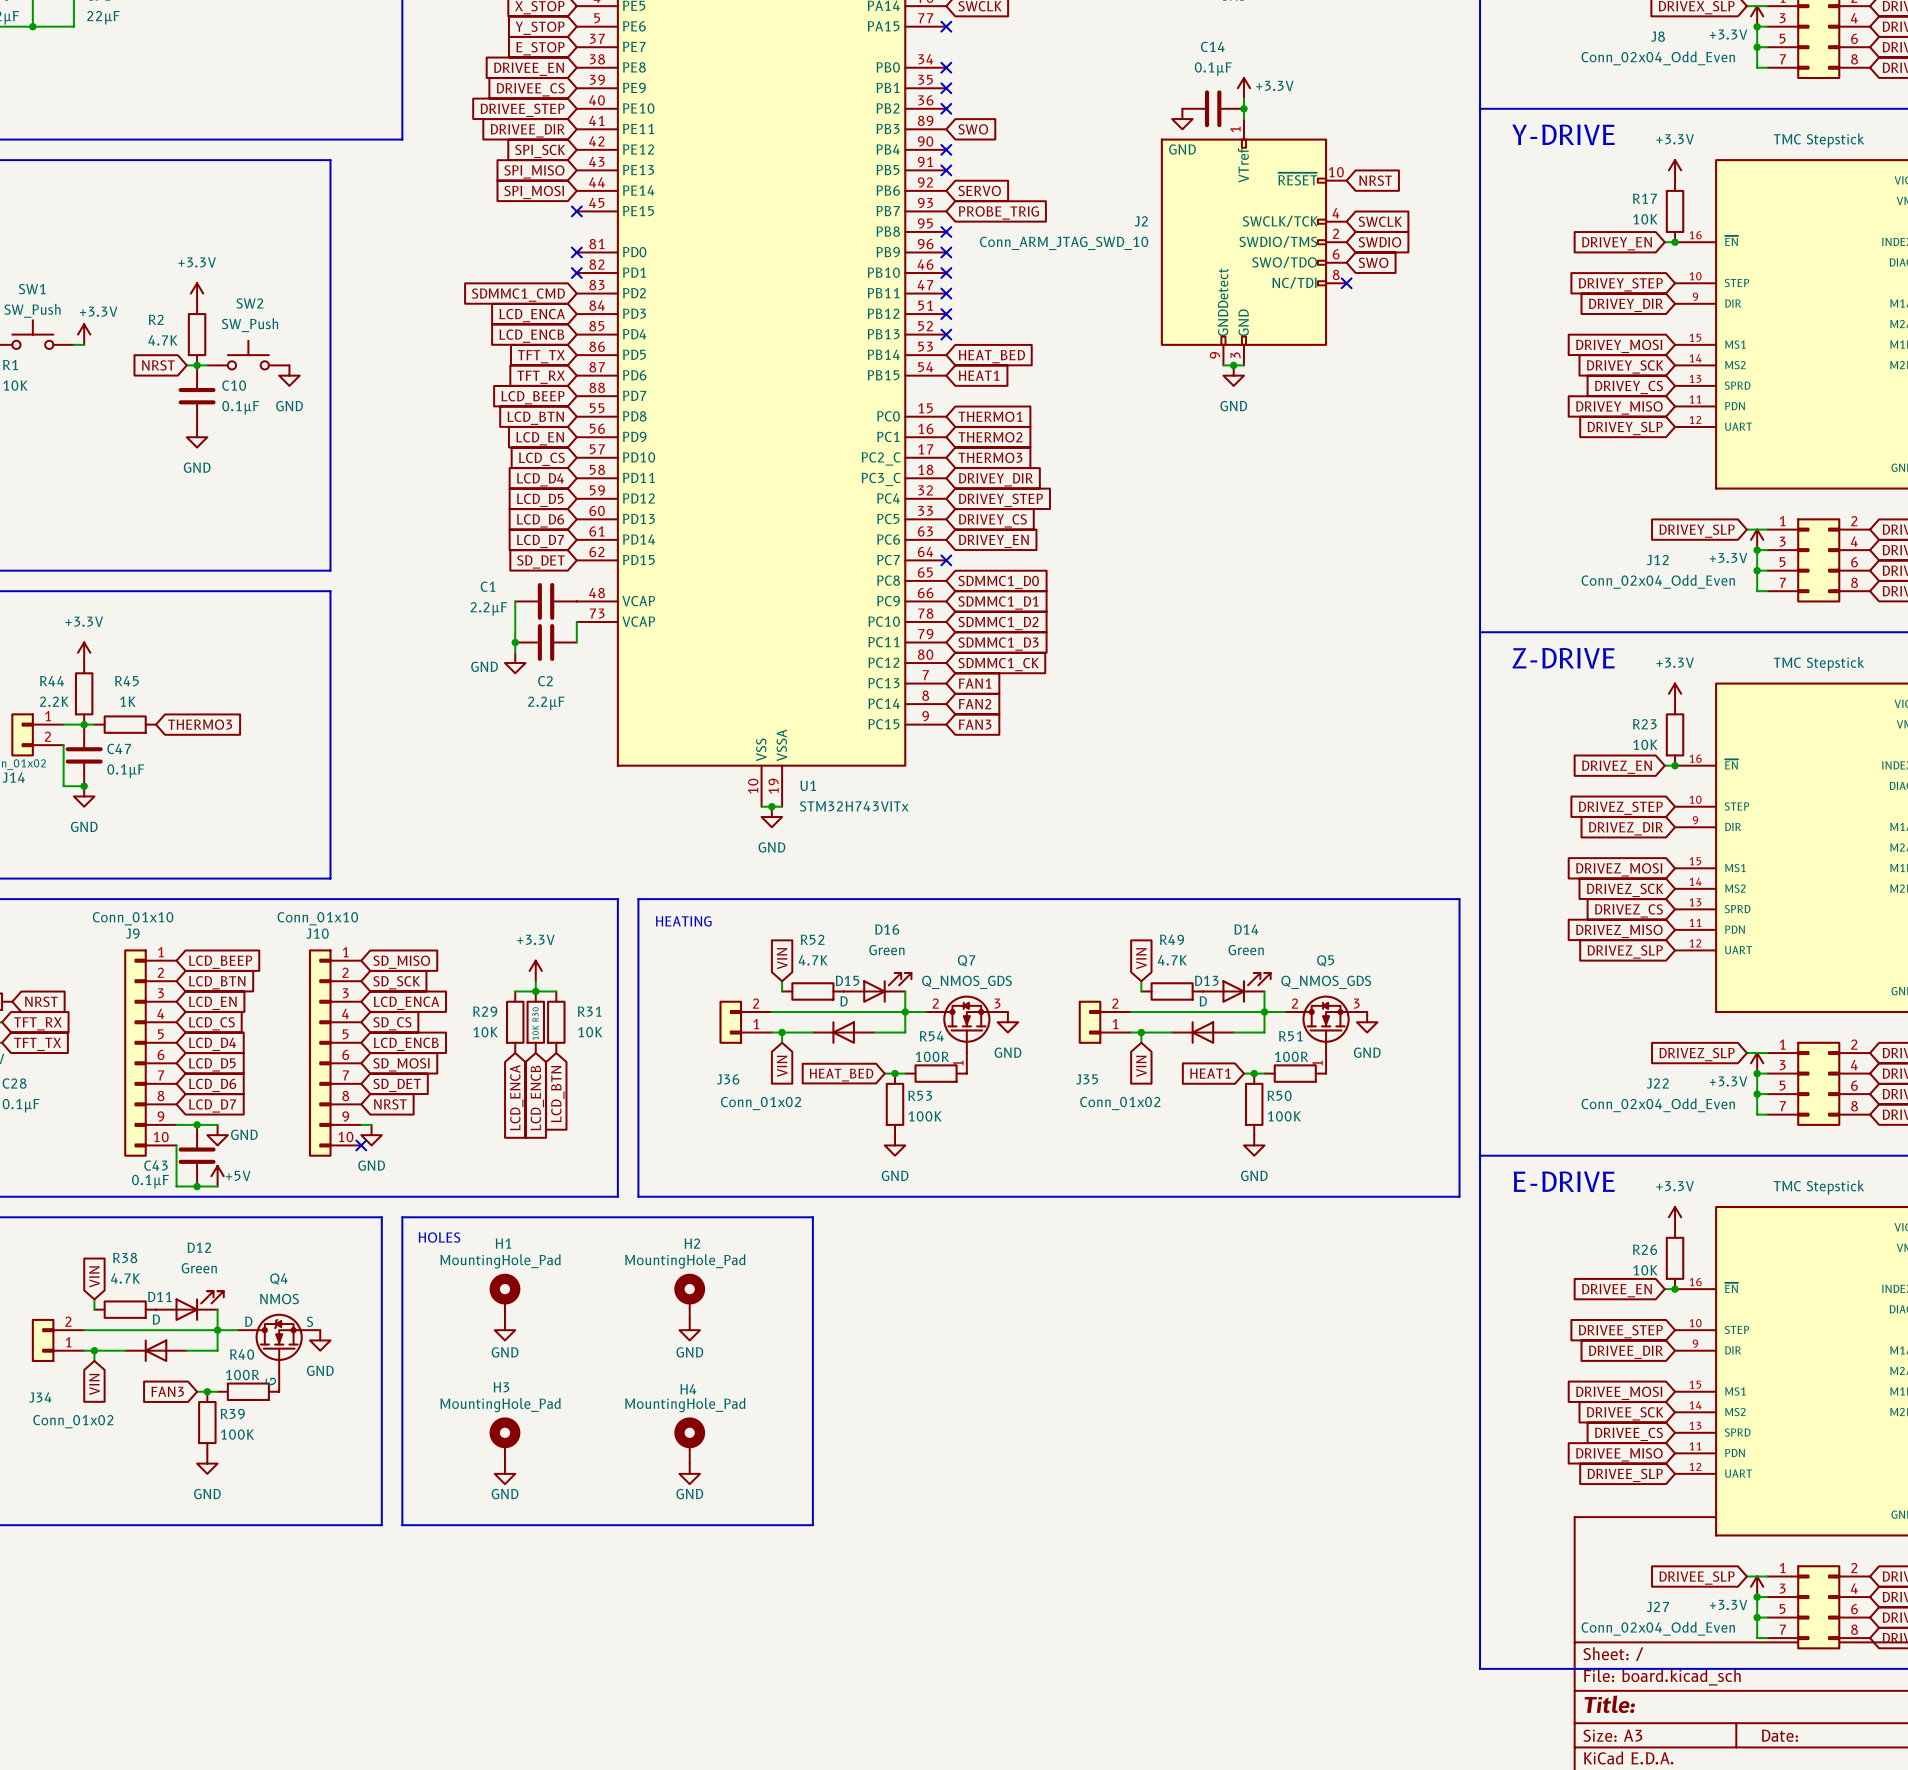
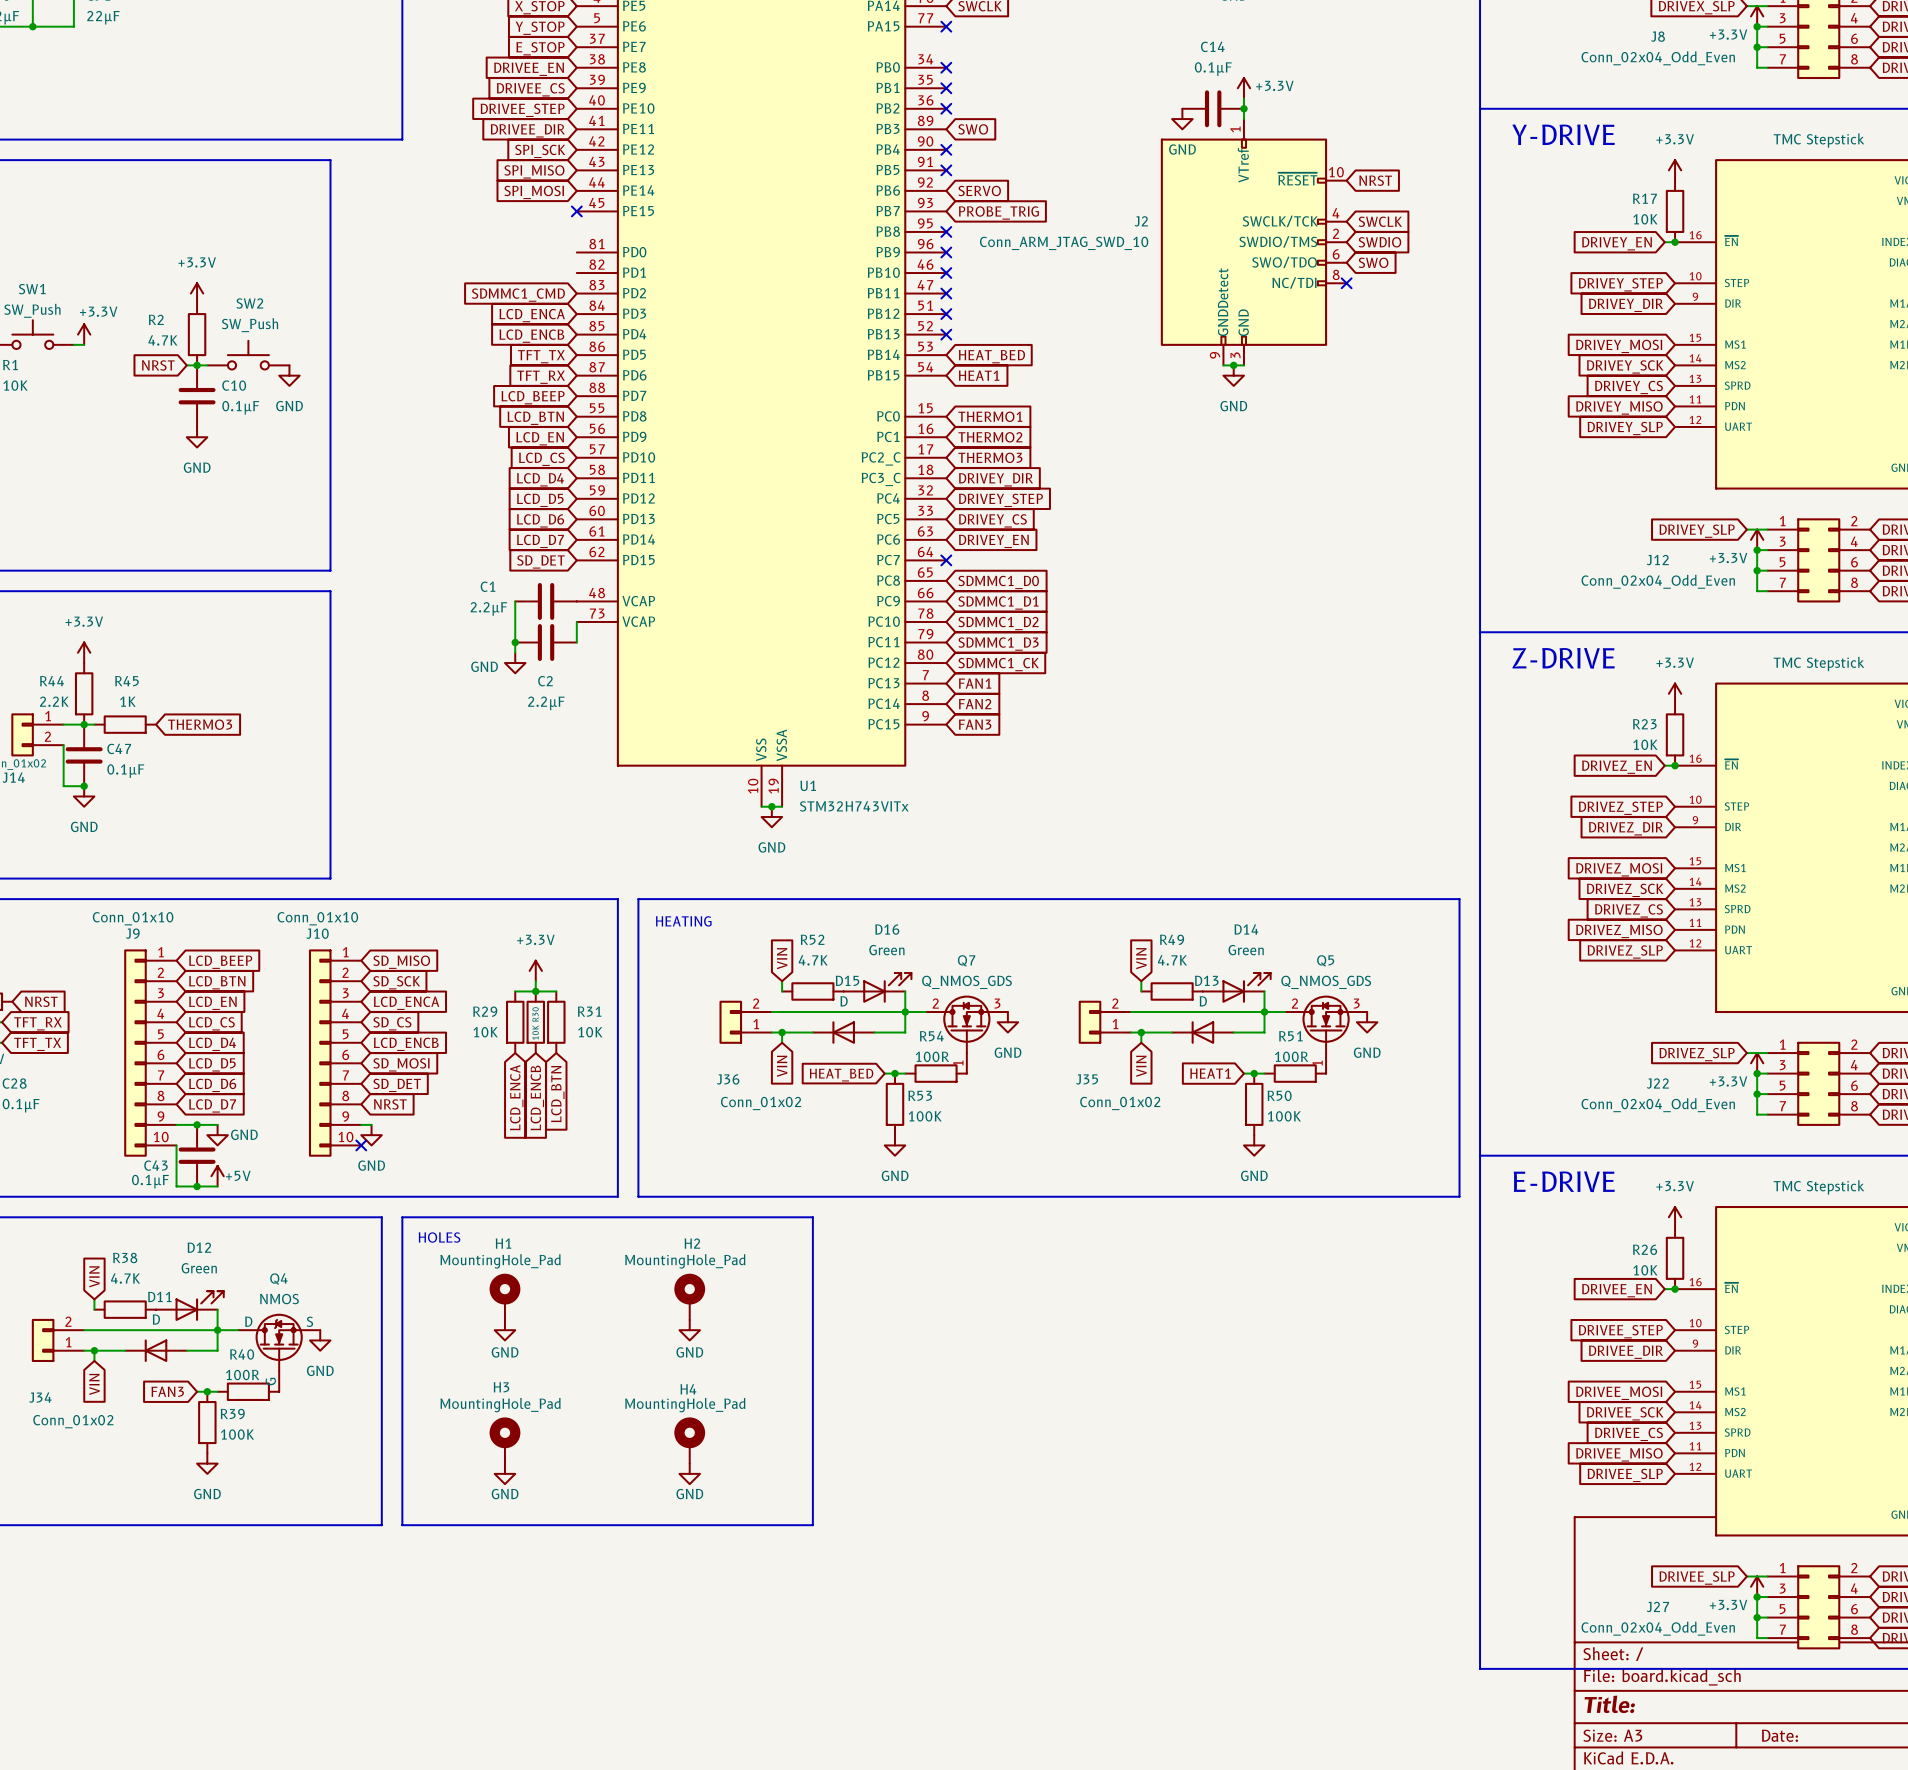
no-connect mark: (576, 252) -> none
no-connect mark: (576, 273) -> none

